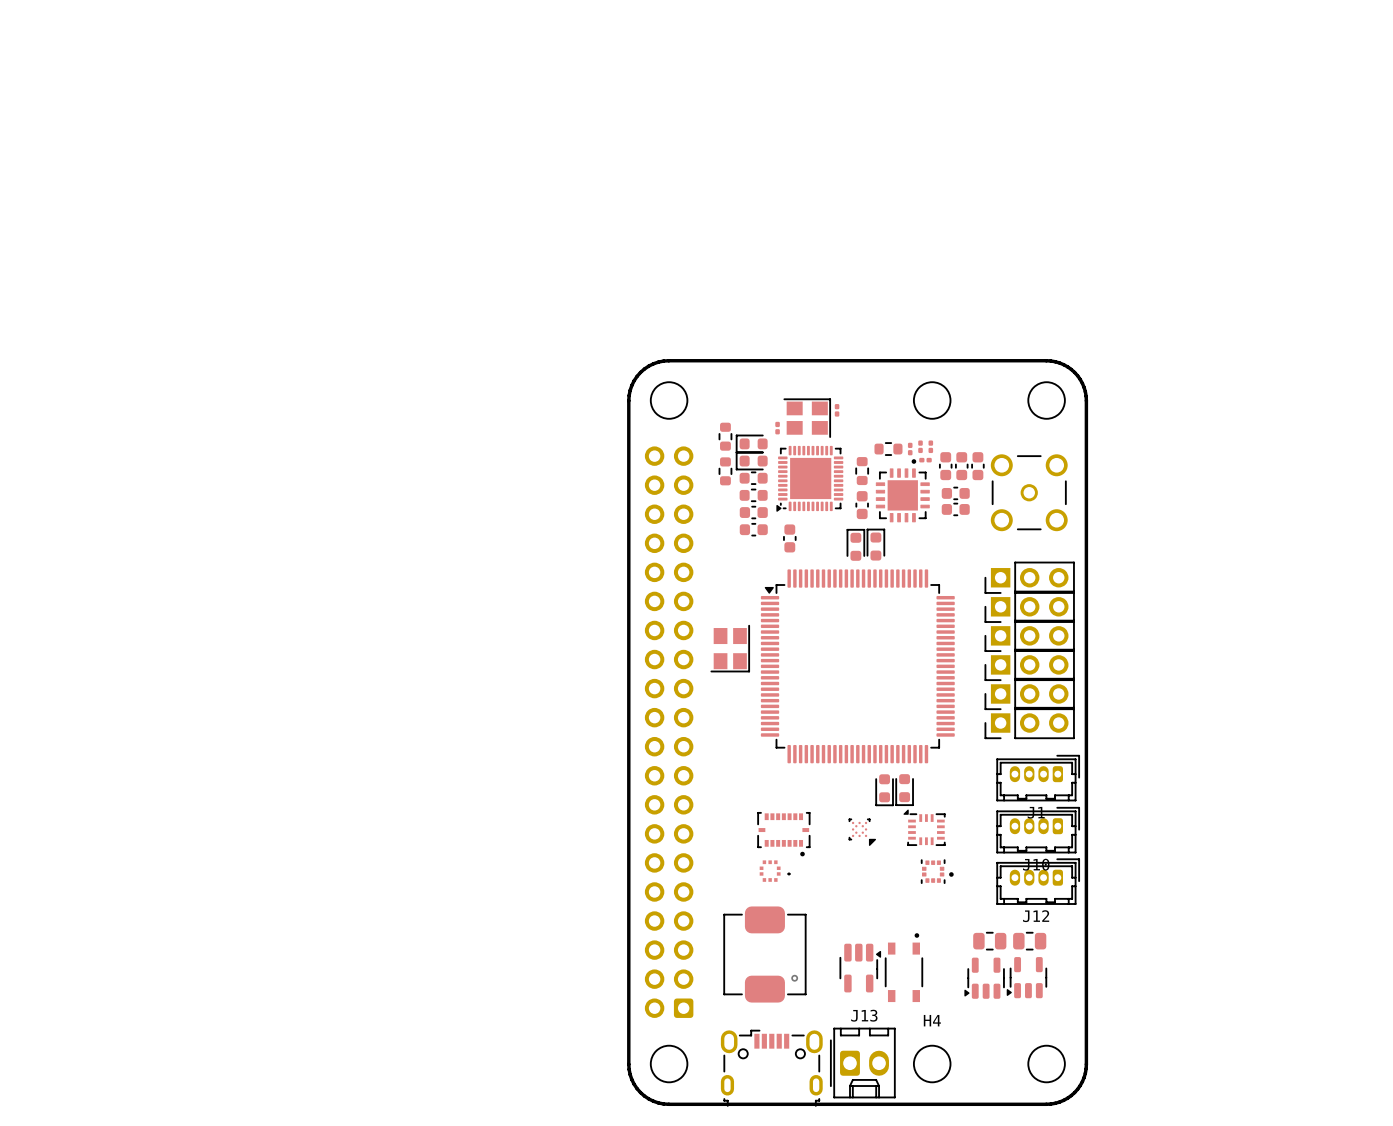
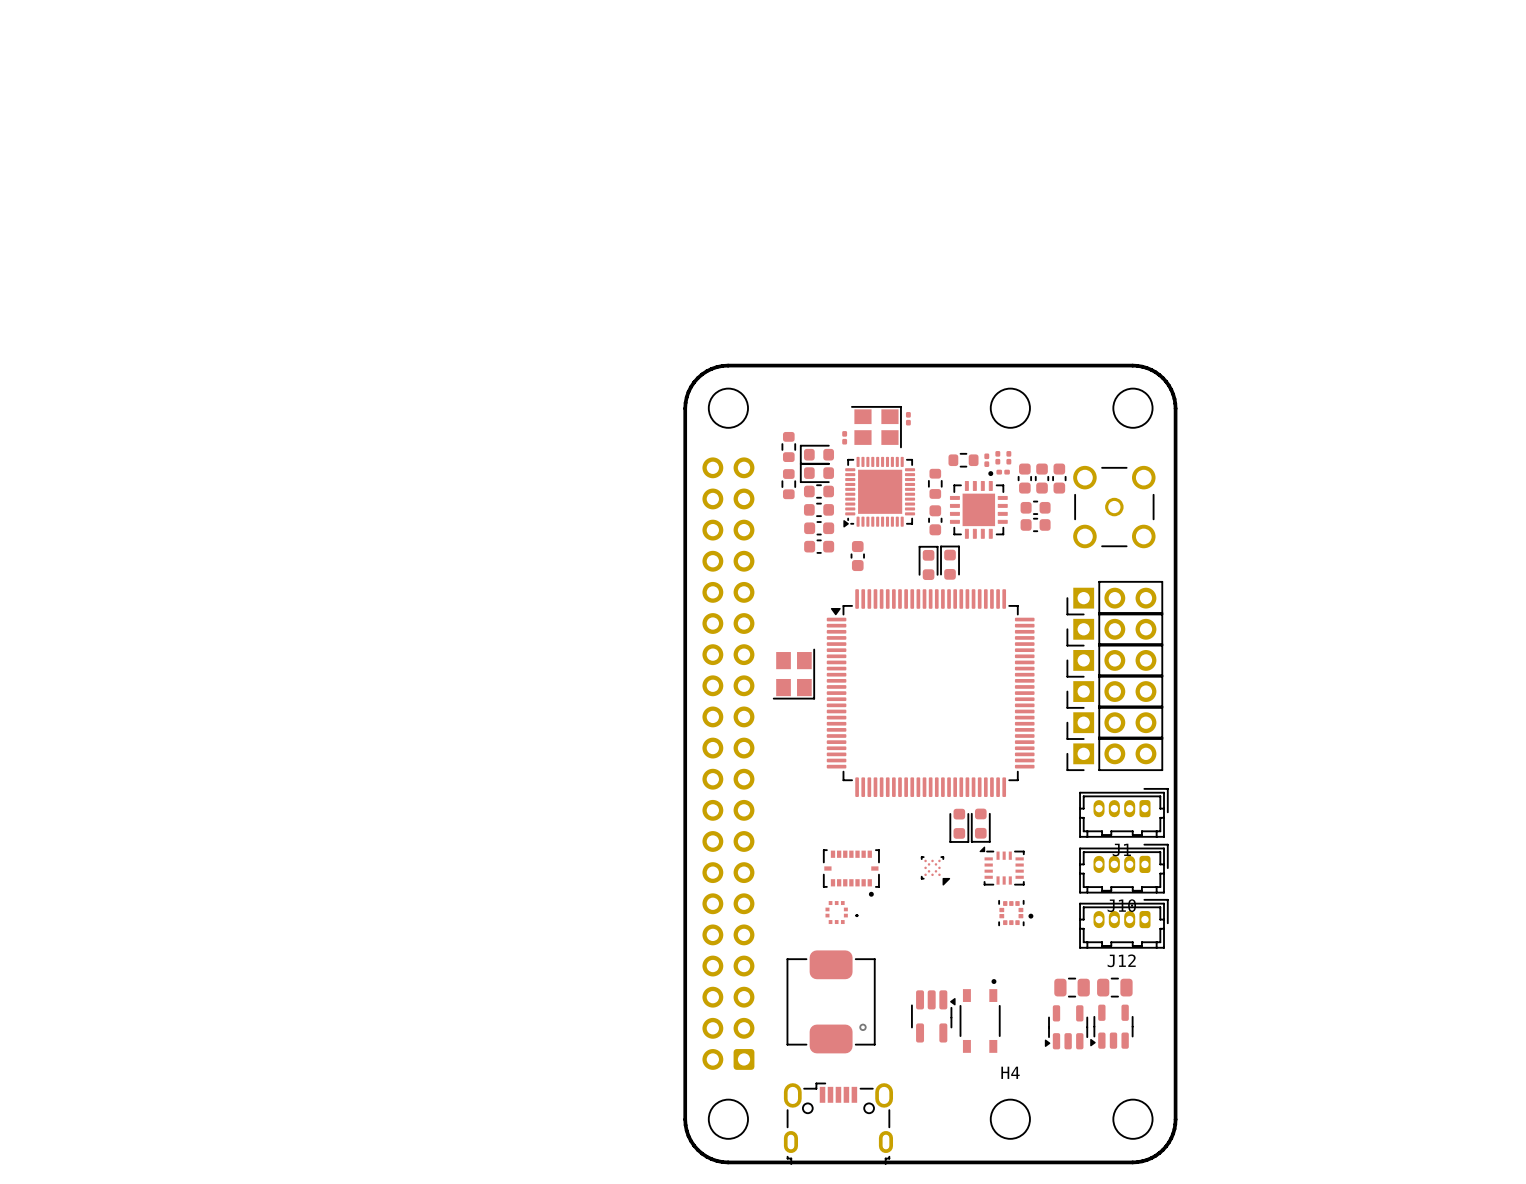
J13: (862, 1063) -> none

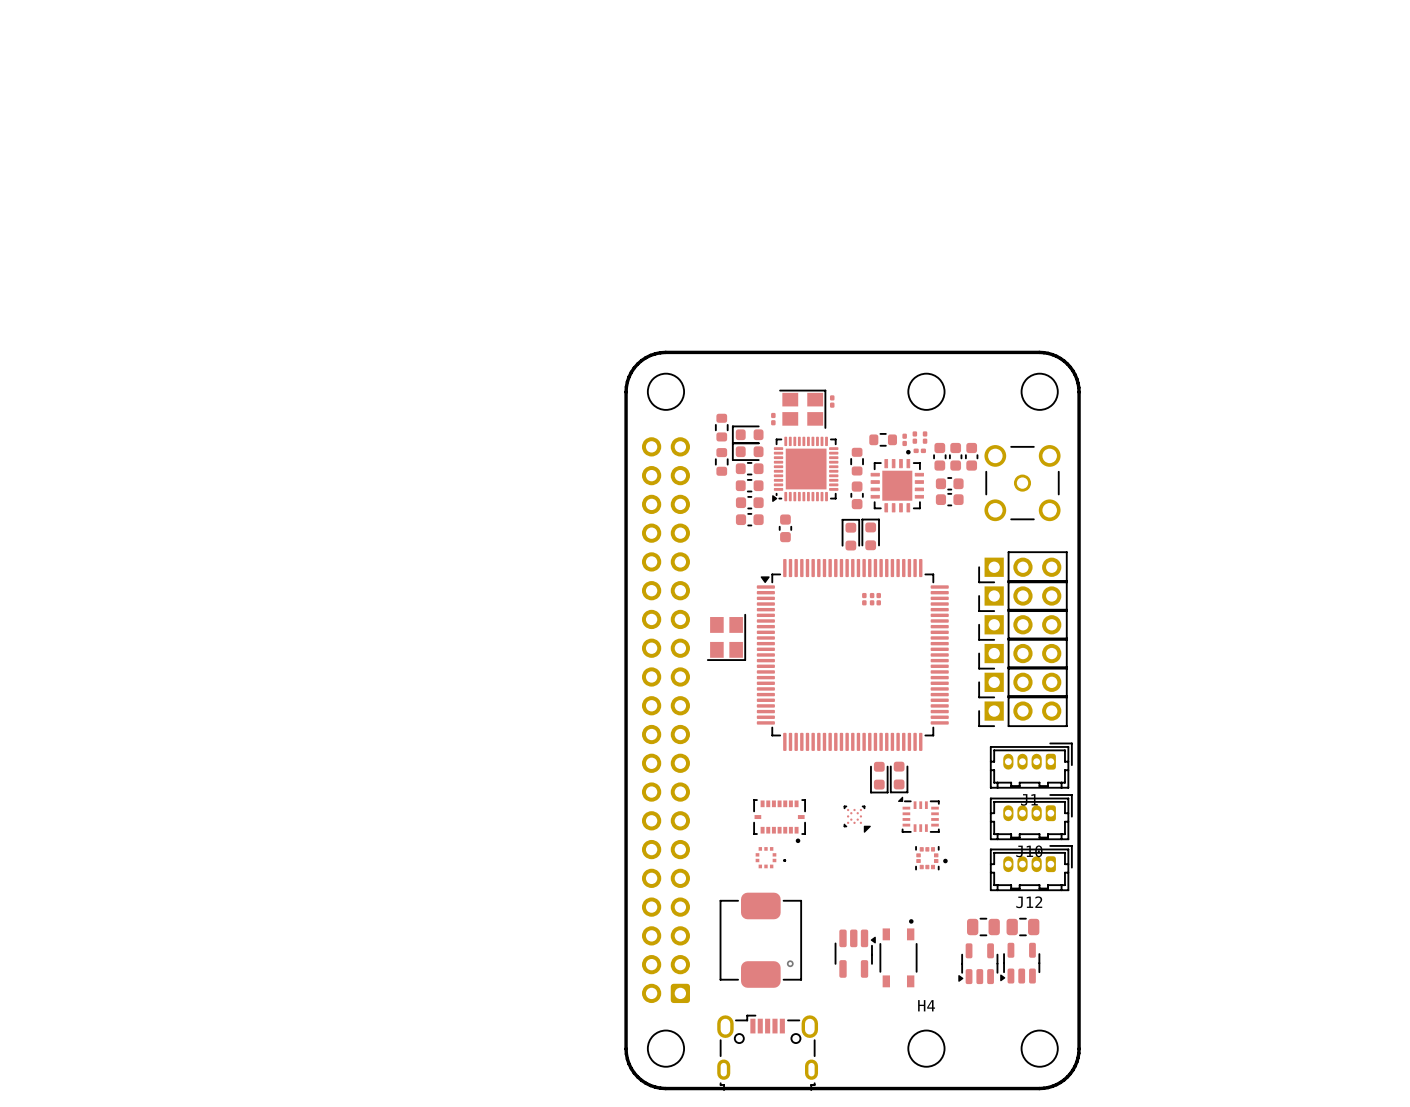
part: none -> (864, 599)
part: none -> (872, 599)
part: none -> (878, 599)

